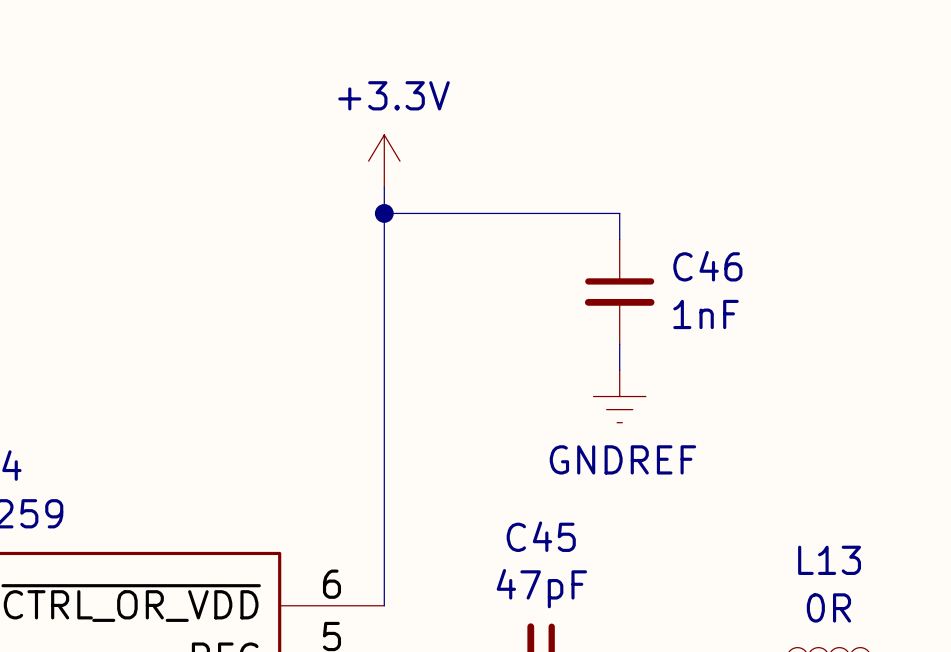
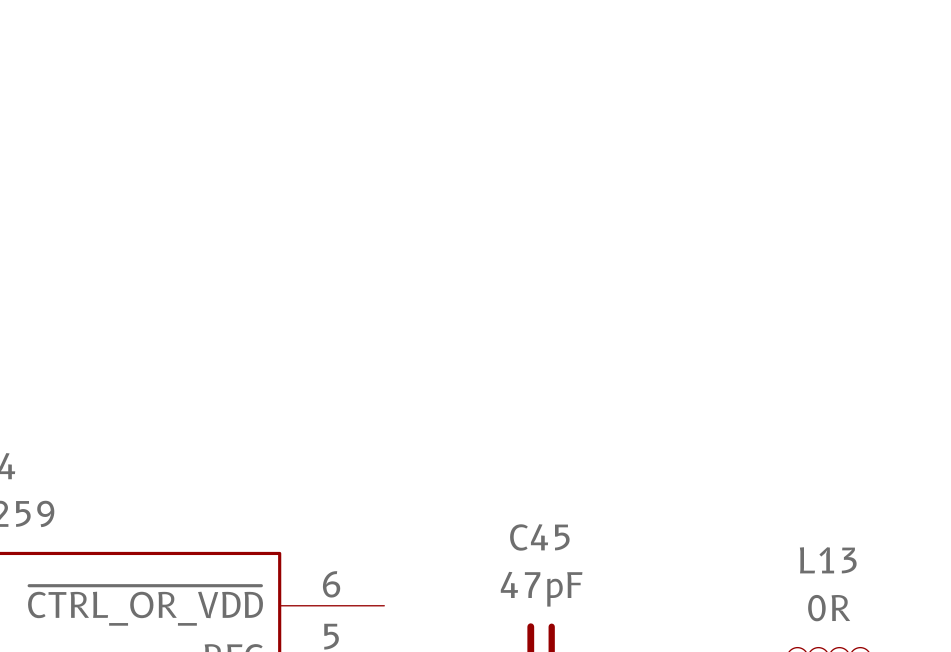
power symbol: +3.3V (384, 161) -> none
wire: (384, 187) (384, 605) -> none
wire: (384, 213) (619, 213) (619, 239) -> none
junction: (384, 213) -> none
C46: 1nF (619, 291) -> none
wire: (619, 344) (619, 370) -> none
power symbol: GNDREF (619, 396) -> none

